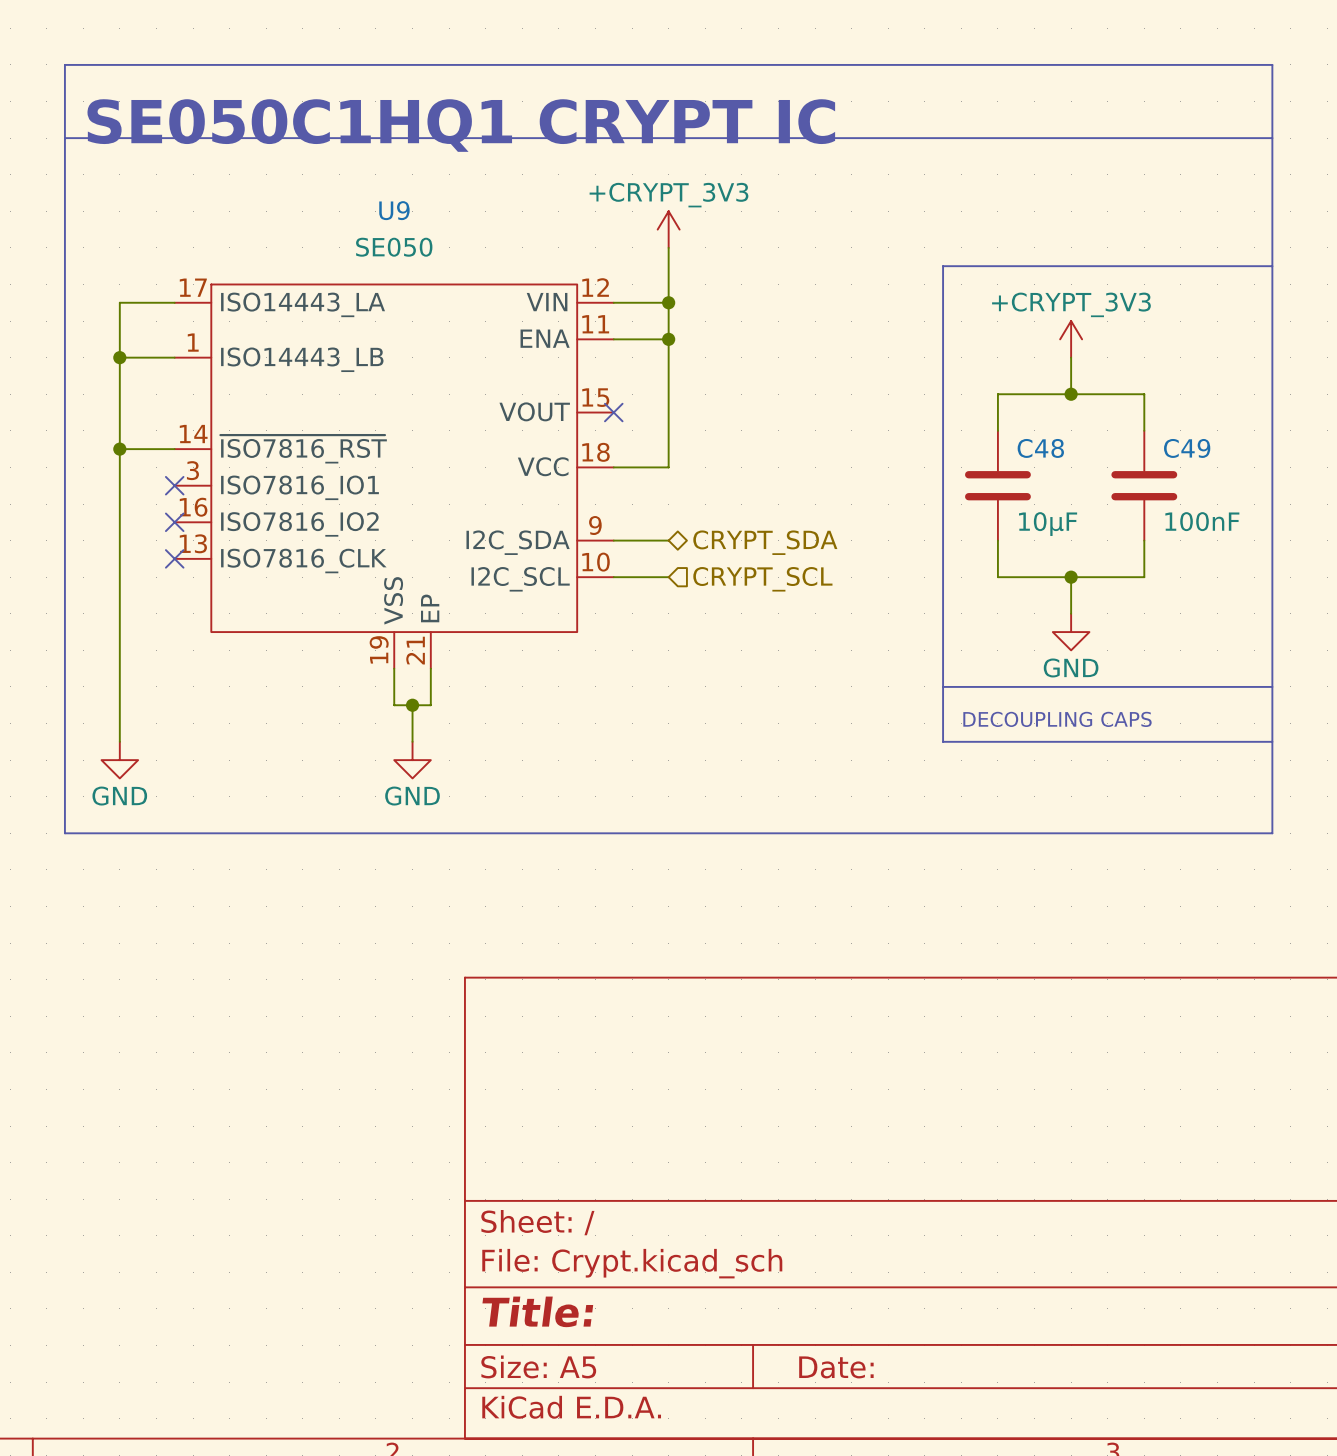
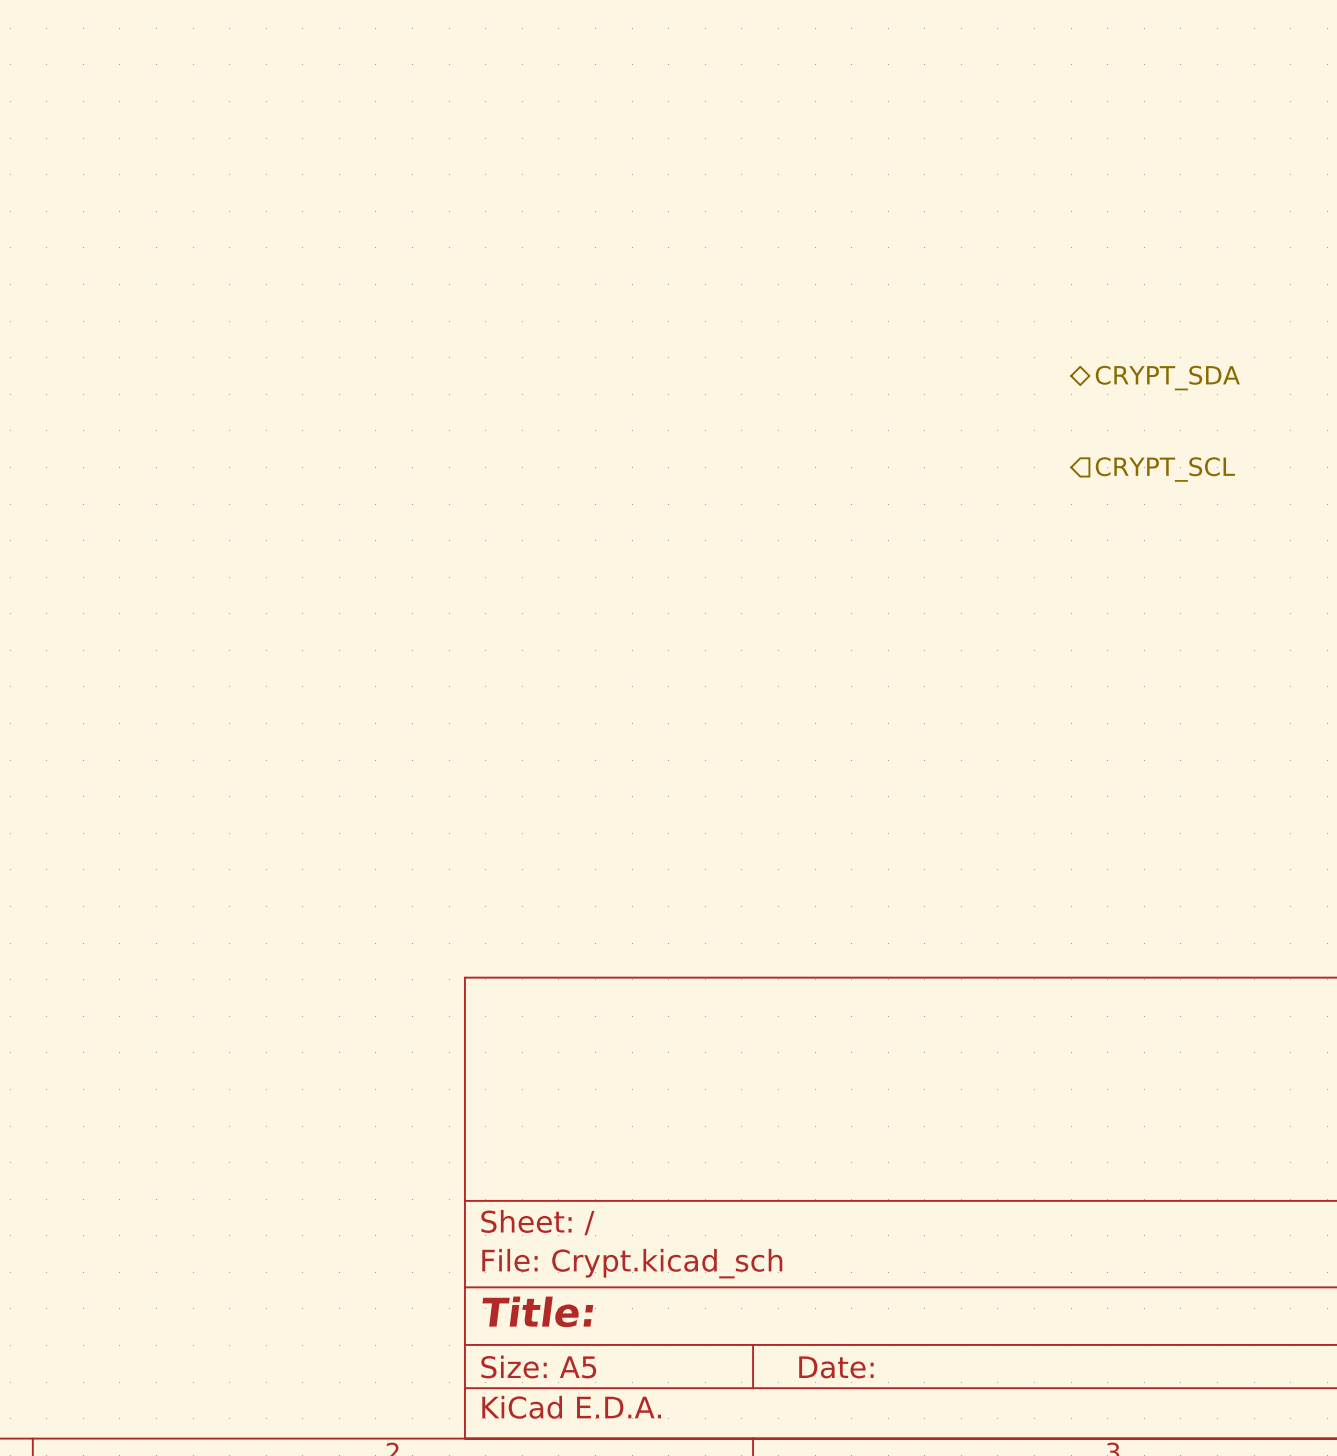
line: (64, 64) (1272, 64) (1272, 833) (64, 833) (64, 64) -> none
text: SE050C1HQ1 CRYPT IC (461, 125) -> none
line: (64, 138) (1272, 138) -> none
power symbol: +CRYPT_3V3 (668, 229) -> none
wire: (668, 247) (668, 467) (613, 467) -> none
line: (1272, 266) (943, 266) (943, 741) (1272, 741) -> none
wire: (174, 302) (119, 302) (119, 741) -> none
wire: (613, 302) (668, 302) -> none
junction: (668, 302) -> none
wire: (613, 339) (668, 339) -> none
junction: (668, 339) -> none
power symbol: +CRYPT_3V3 (1071, 339) -> none
wire: (119, 357) (174, 357) -> none
junction: (119, 357) -> none
wire: (1071, 357) (1071, 394) -> none
hierarchical label: none -> CRYPT_SDA (1167, 378)
junction: (1071, 394) -> none
no-connect mark: (613, 412) -> none
wire: (997, 430) (997, 394) (1144, 394) (1144, 430) -> none
wire: (119, 449) (174, 449) -> none
junction: (119, 449) -> none
hierarchical label: none -> CRYPT_SCL (1165, 469)
U9: SE050 (394, 476) -> none
no-connect mark: (174, 485) -> none
C48: 10μF (997, 485) -> none
C49: 100nF (1144, 485) -> none
no-connect mark: (174, 522) -> none
wire: (613, 540) (668, 540) -> none
wire: (997, 540) (997, 577) (1144, 577) (1144, 540) -> none
hierarchical label: CRYPT_SDA (765, 542) -> none
no-connect mark: (174, 558) -> none
wire: (613, 577) (668, 577) -> none
wire: (1071, 577) (1071, 613) -> none
junction: (1071, 577) -> none
hierarchical label: CRYPT_SCL (762, 579) -> none
power symbol: GND (1071, 632) -> none
wire: (394, 668) (394, 705) (430, 705) (430, 668) -> none
line: (943, 686) (1272, 686) -> none
wire: (412, 705) (412, 741) -> none
junction: (412, 705) -> none
text: DECOUPLING CAPS (1057, 719) -> none
power symbol: GND (119, 760) -> none
power symbol: GND (412, 760) -> none

